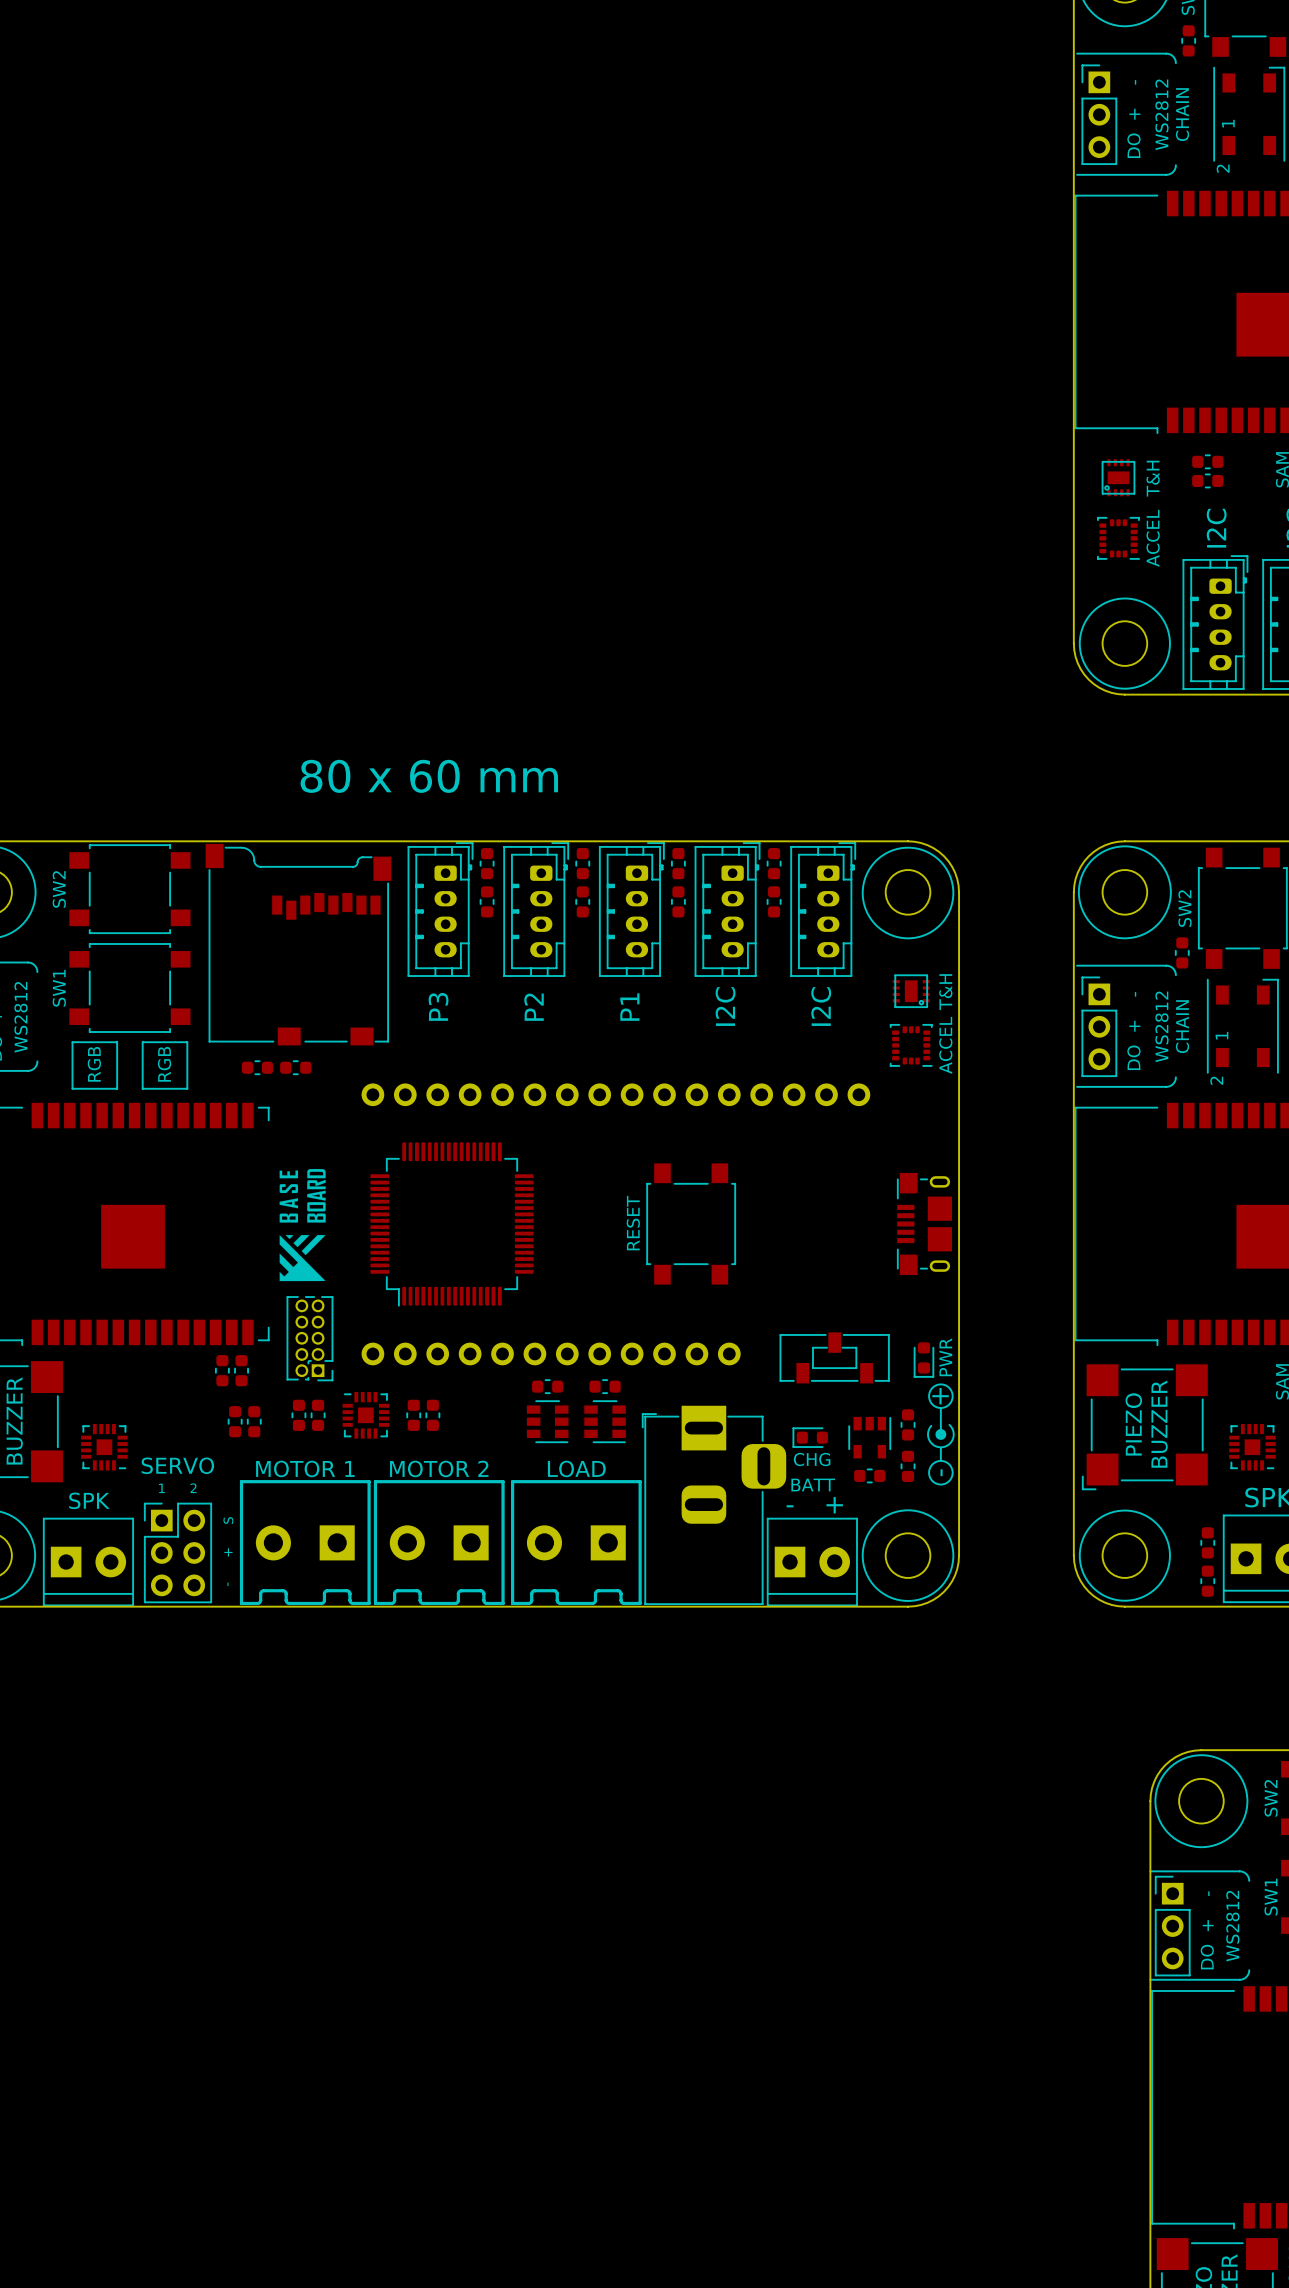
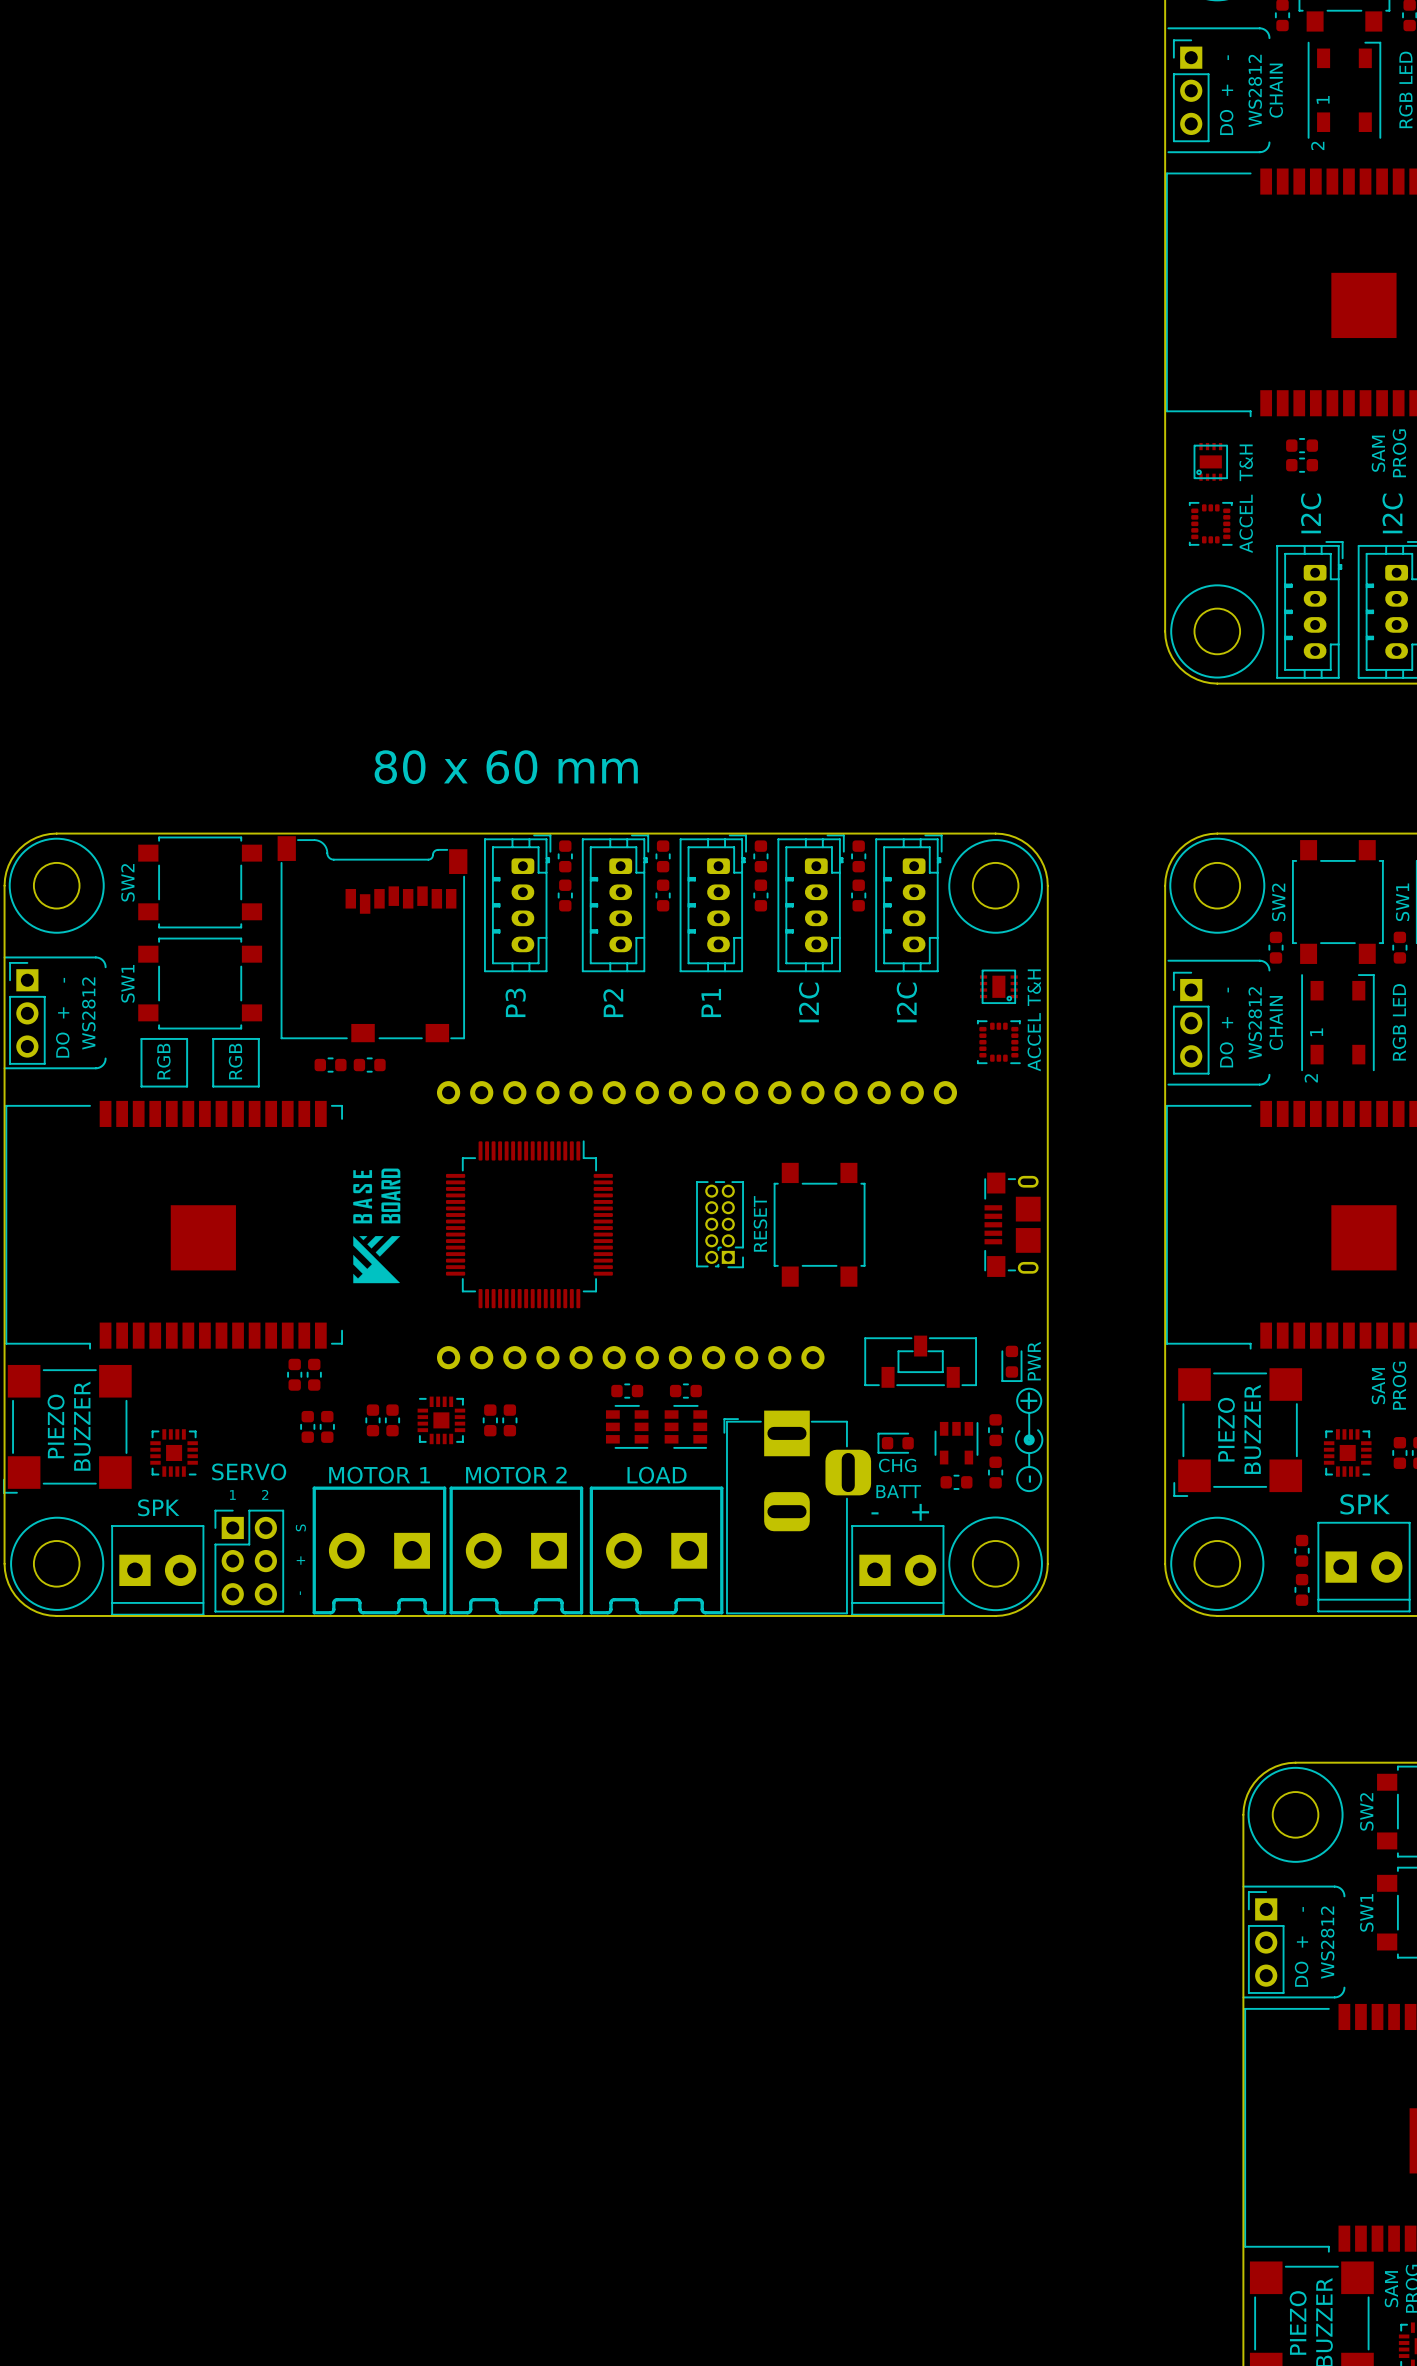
text position: RESET (633, 1223) -> RESET (760, 1223)
part: none -> (720, 1224)
part position: (691, 1223) -> (819, 1224)
part rotation: 0° (452, 1224) -> 180° (529, 1224)
part: (309, 1338) -> none

